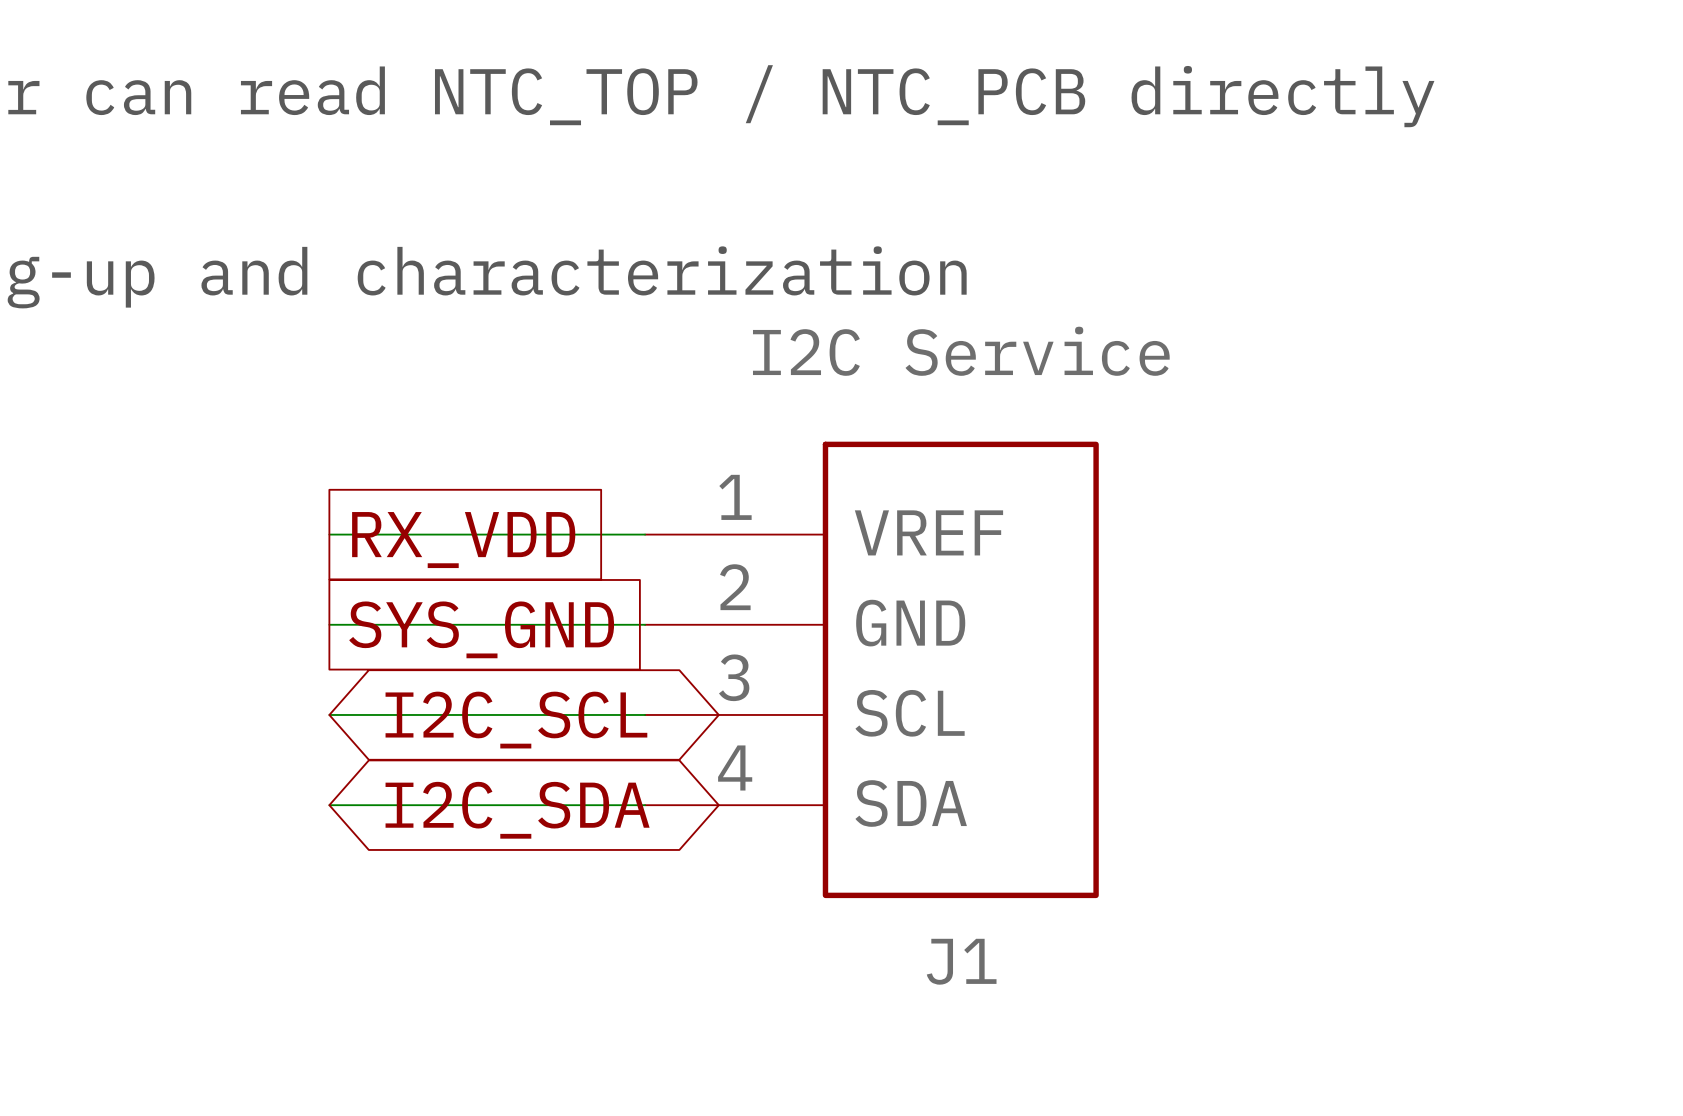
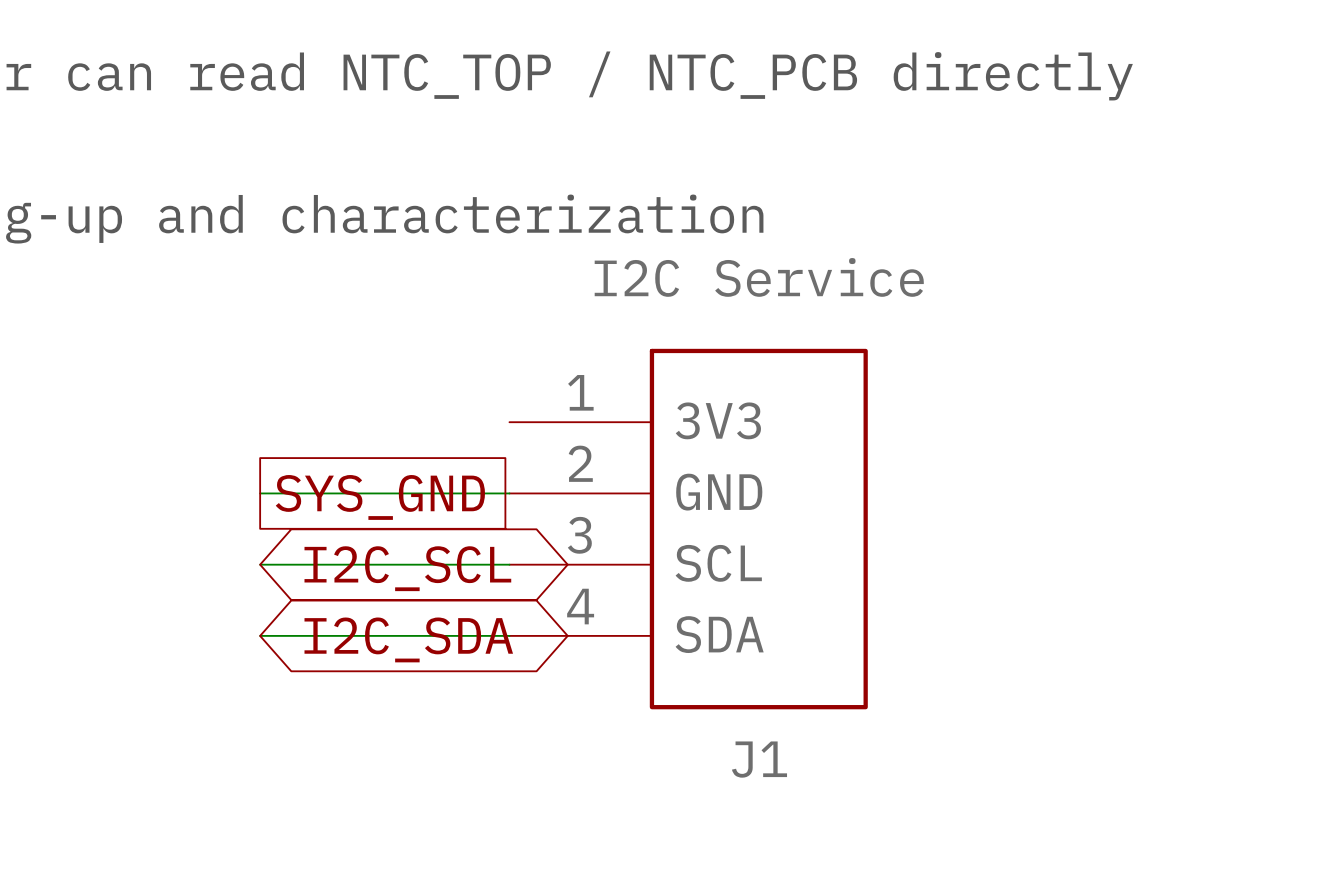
J1 pin name: VREF (928, 532) -> 3V3 (718, 420)
wire: (329, 534) (645, 534) -> none
global label: RX_VDD (463, 540) -> none

